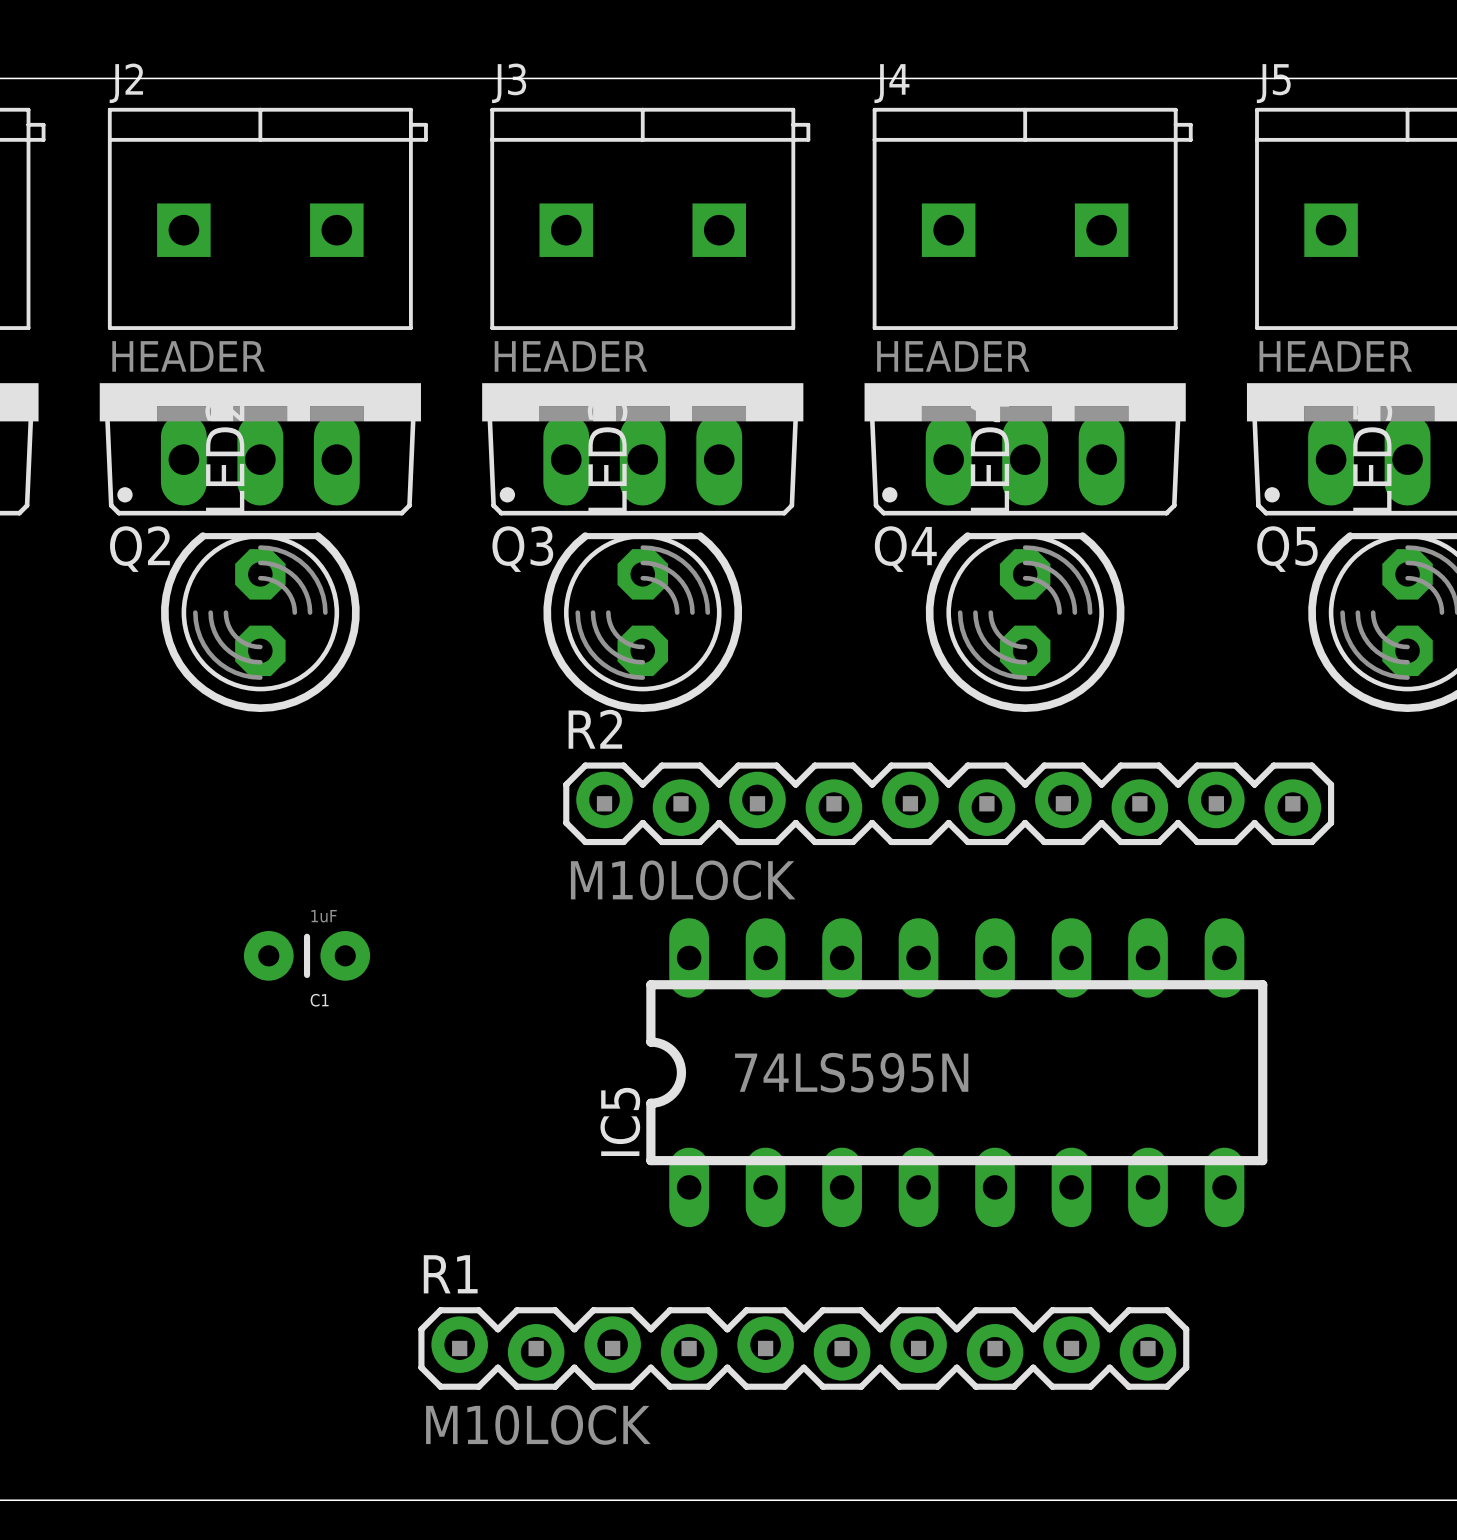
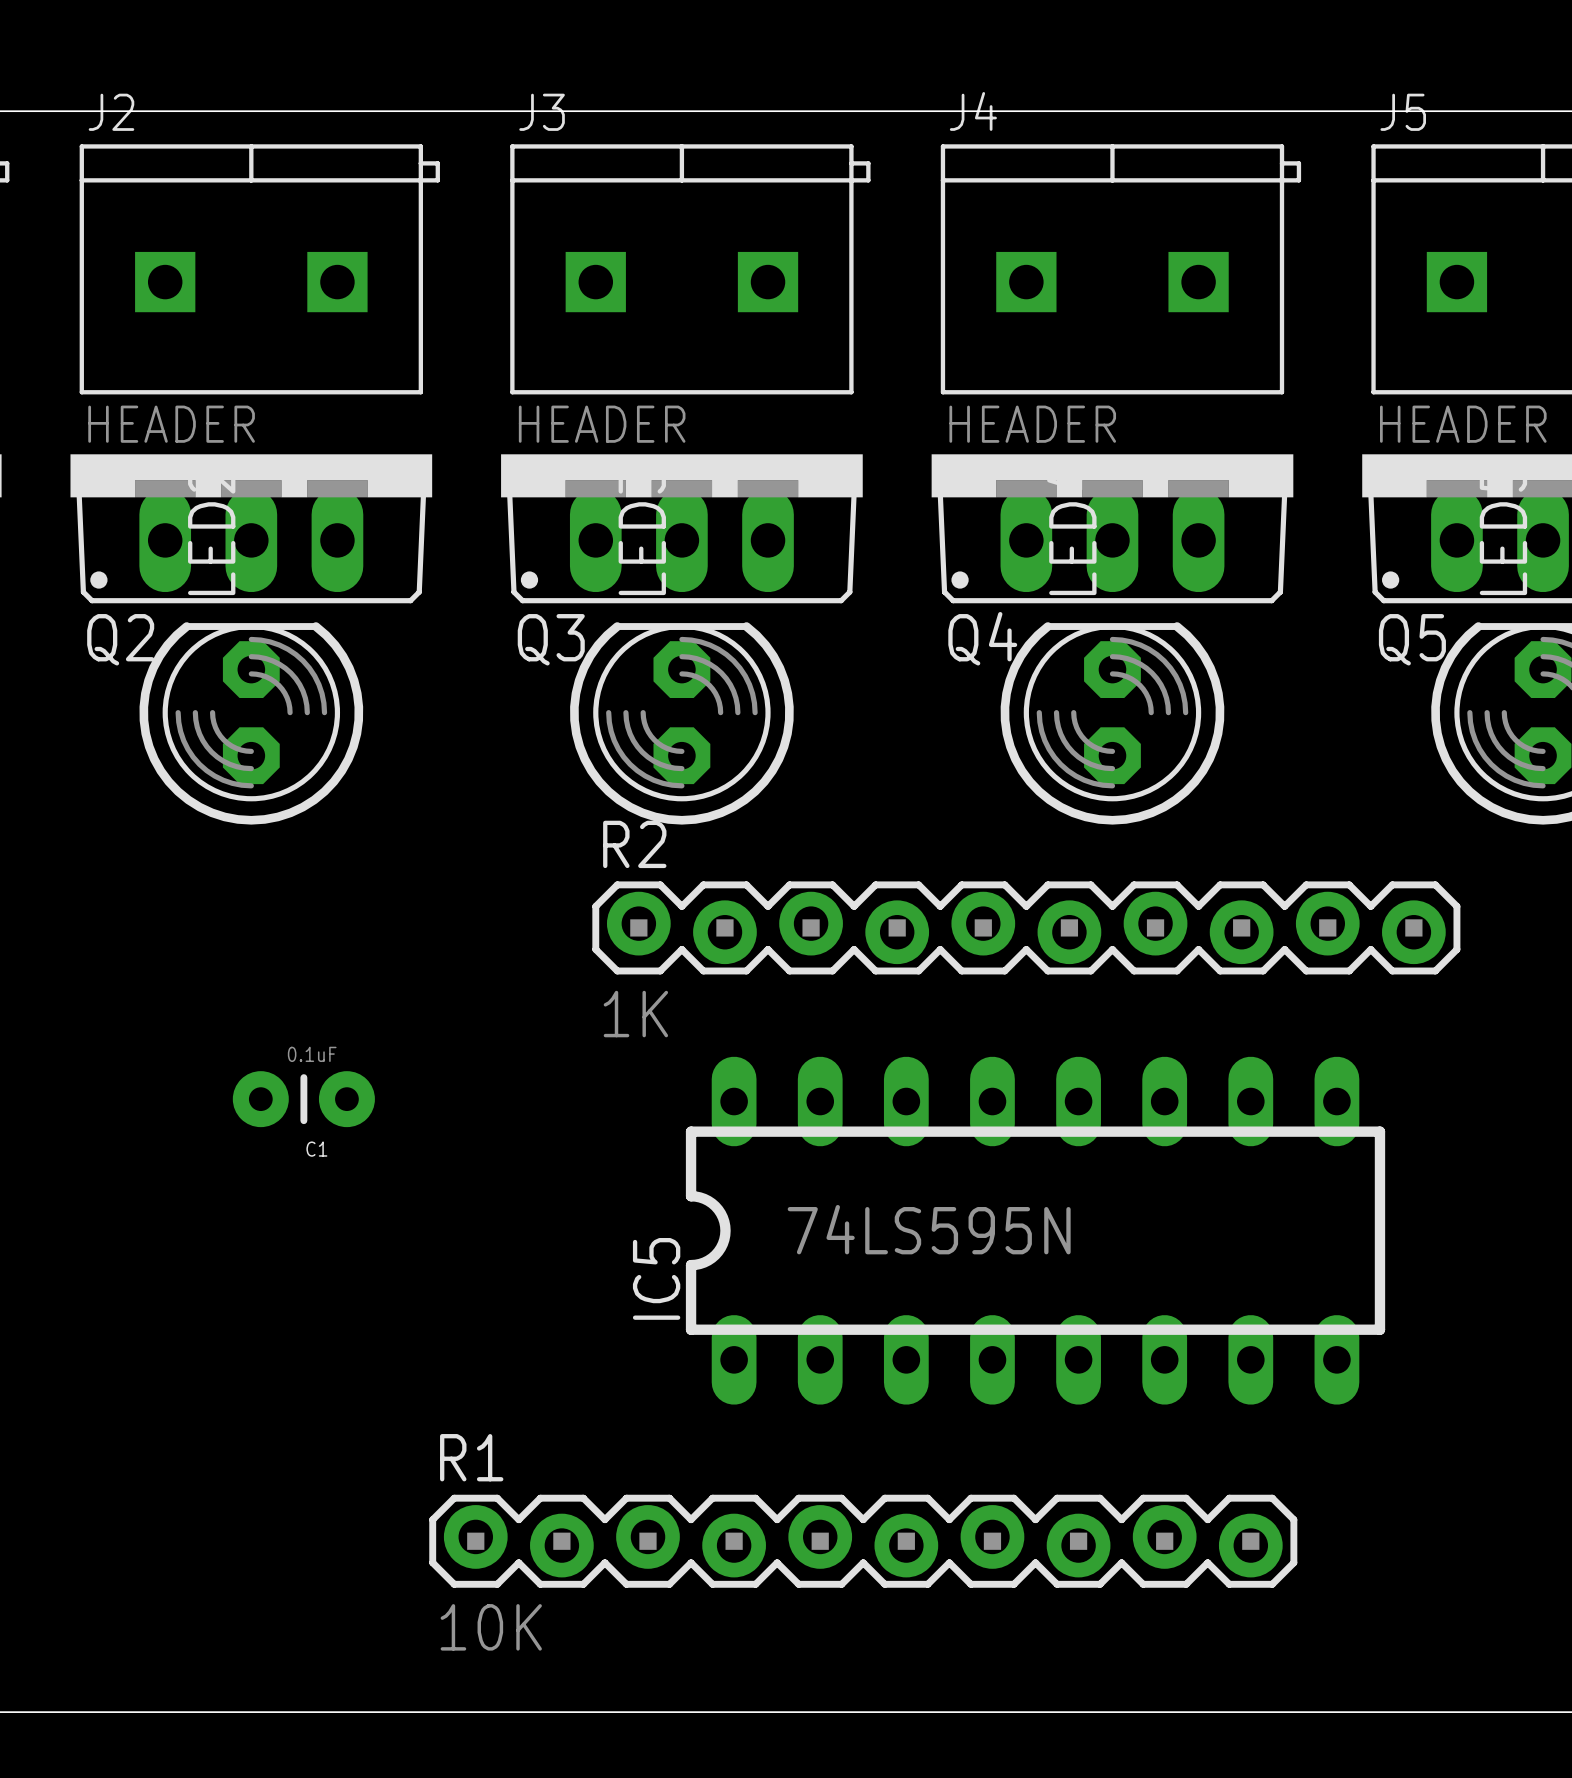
R2 value: M10LOCK (683, 880) -> 1K (635, 1014)
C1 value: 1uF (324, 916) -> 0.1uF (312, 1054)
R1 value: M10LOCK (538, 1425) -> 10K (491, 1627)

